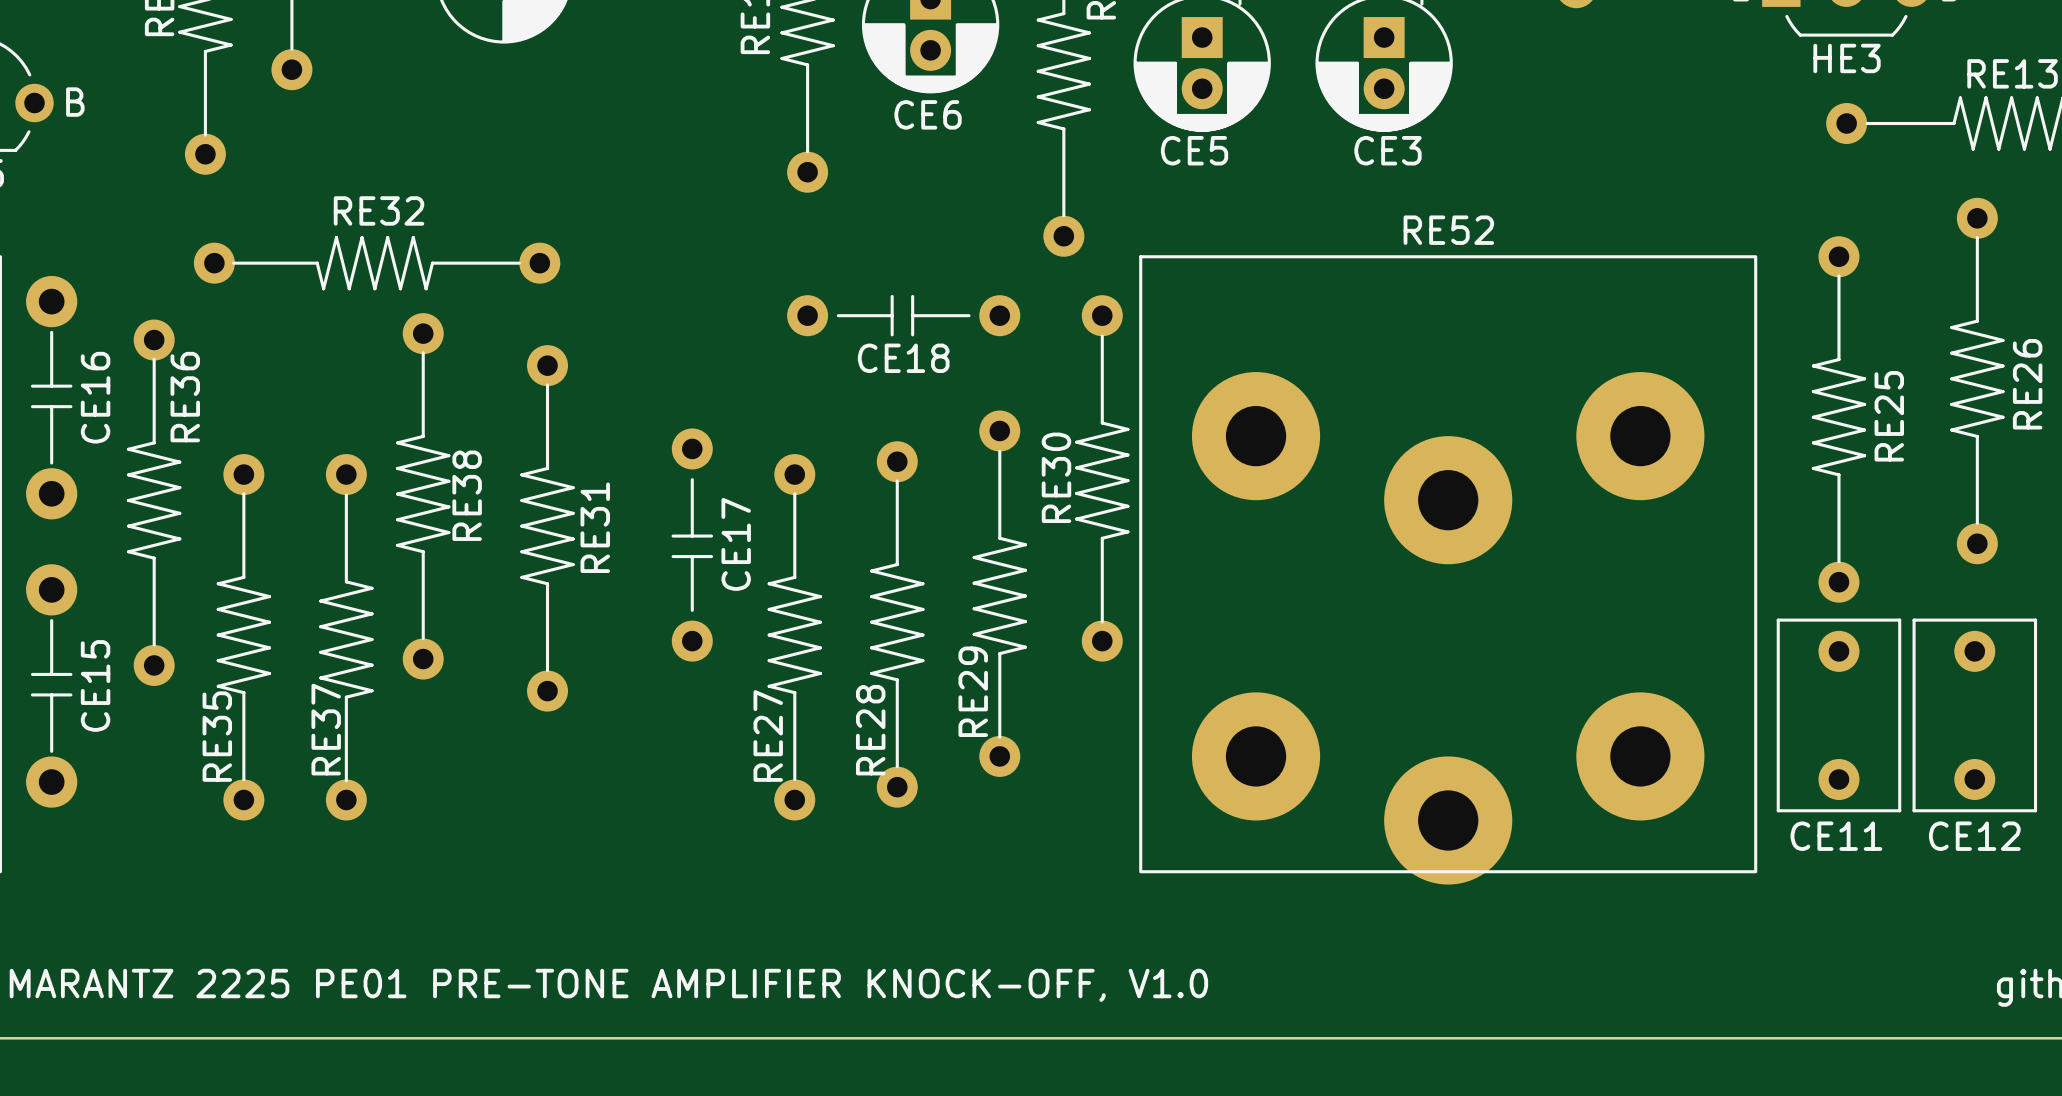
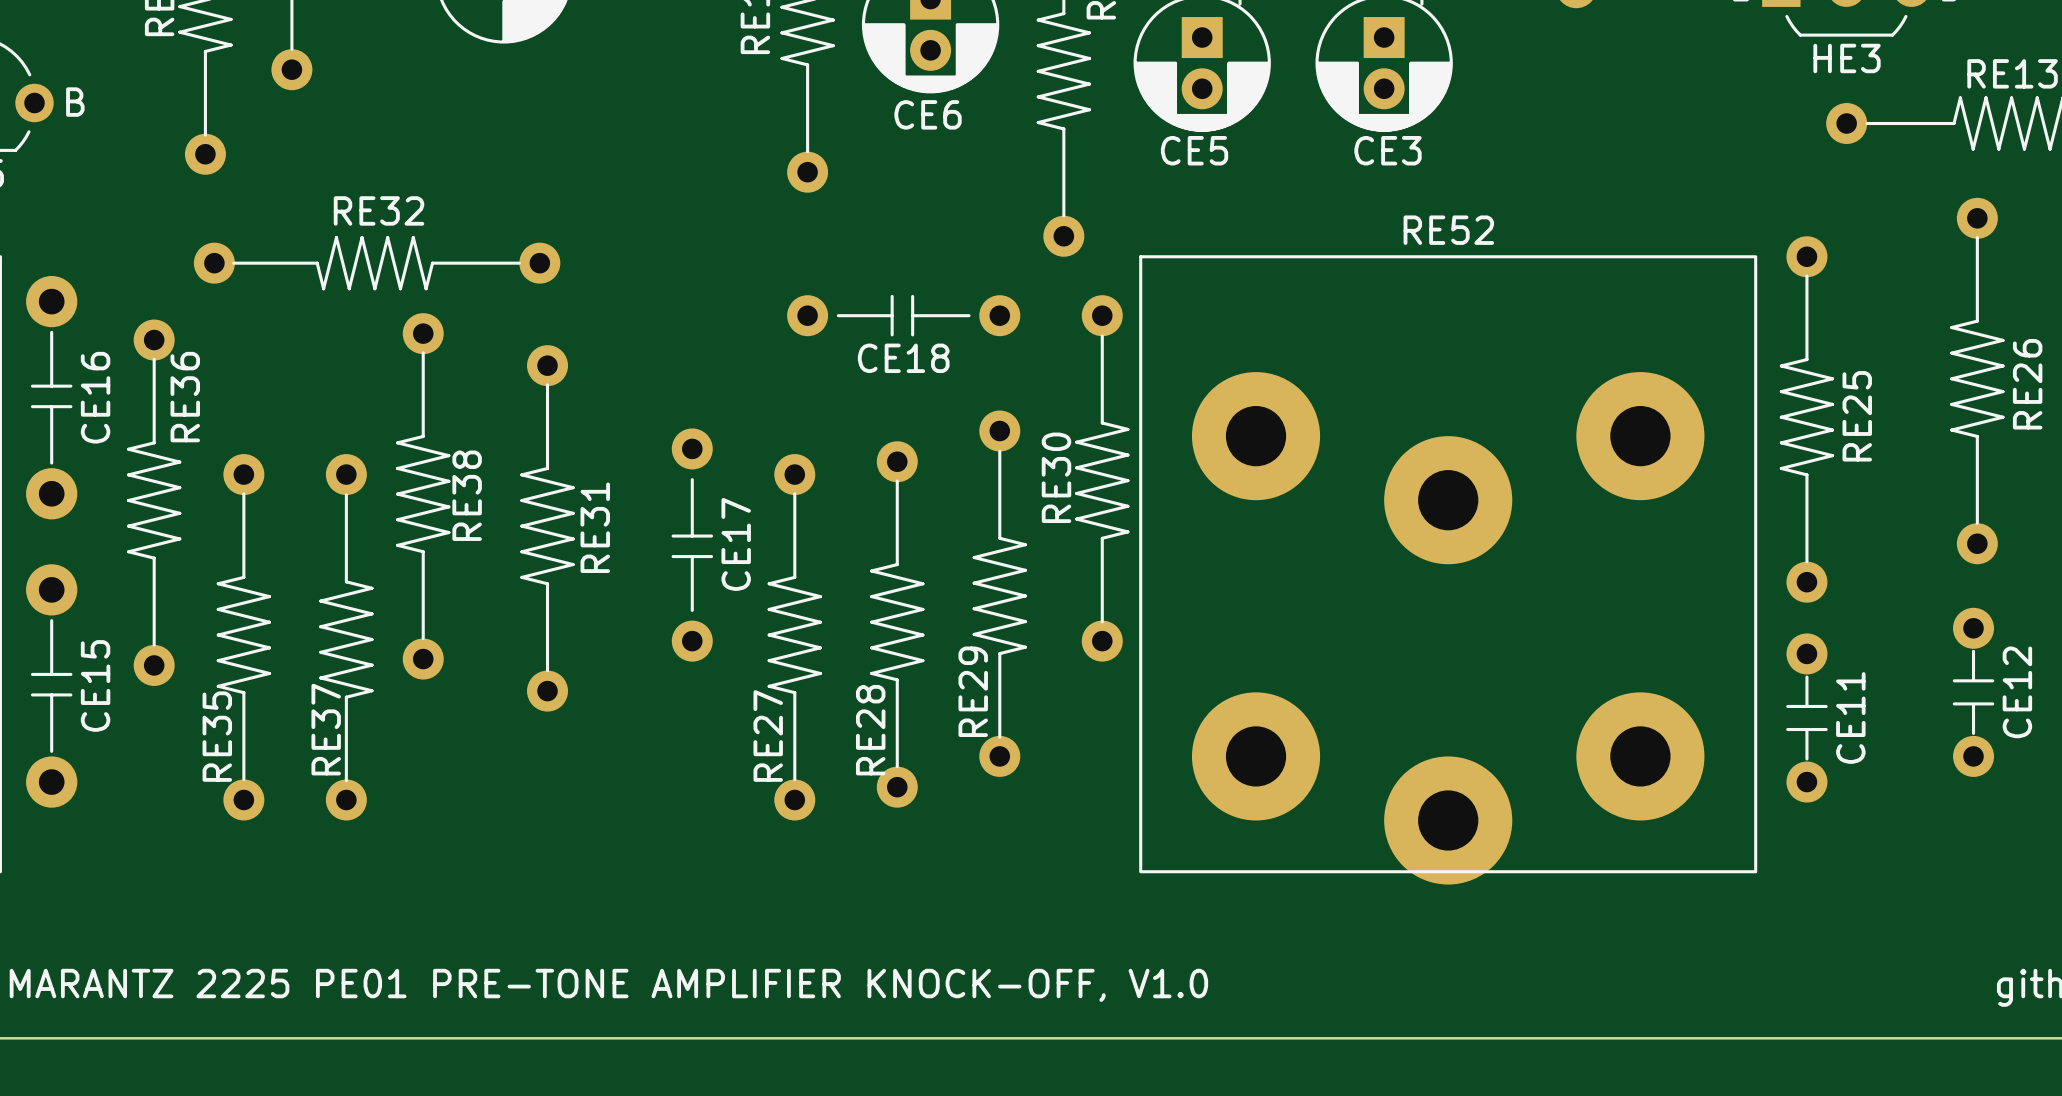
RE25 position: (1838, 419) -> (1806, 419)
CE11 footprint: [1776, 618, 1902, 813] -> [1786, 633, 1828, 803]
CE12 footprint: [1912, 618, 2038, 813] -> [1952, 607, 1995, 777]
CE11 name position: CE11 (1836, 836) -> CE11 (1850, 717)
CE12 name position: CE12 (1974, 836) -> CE12 (2017, 692)

